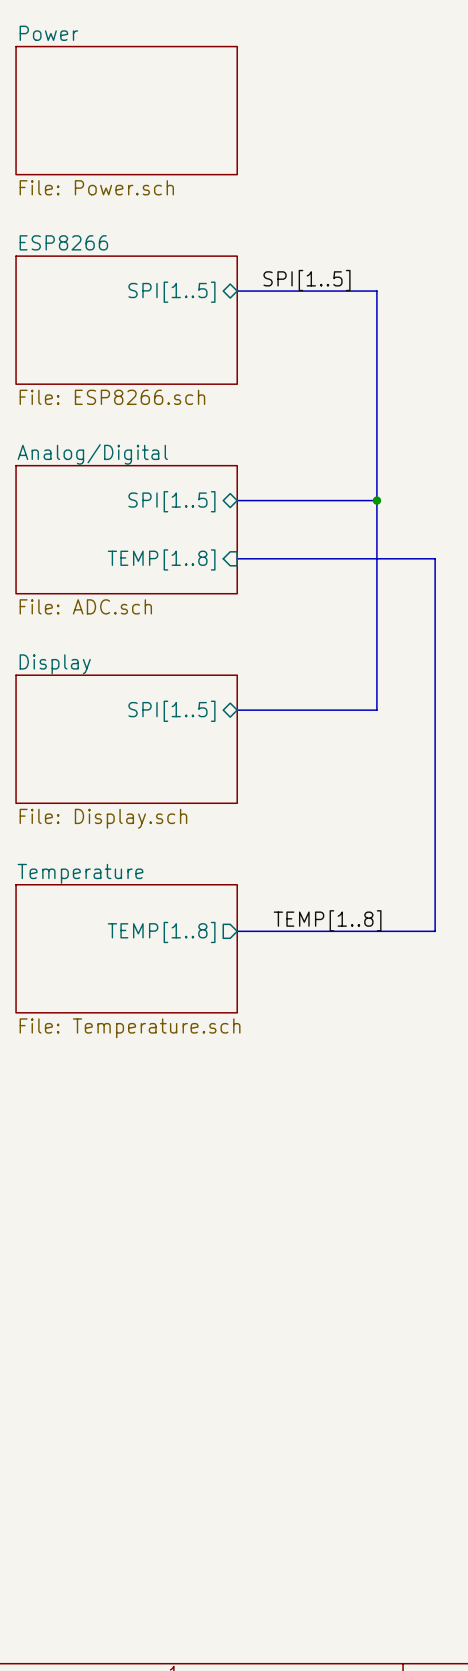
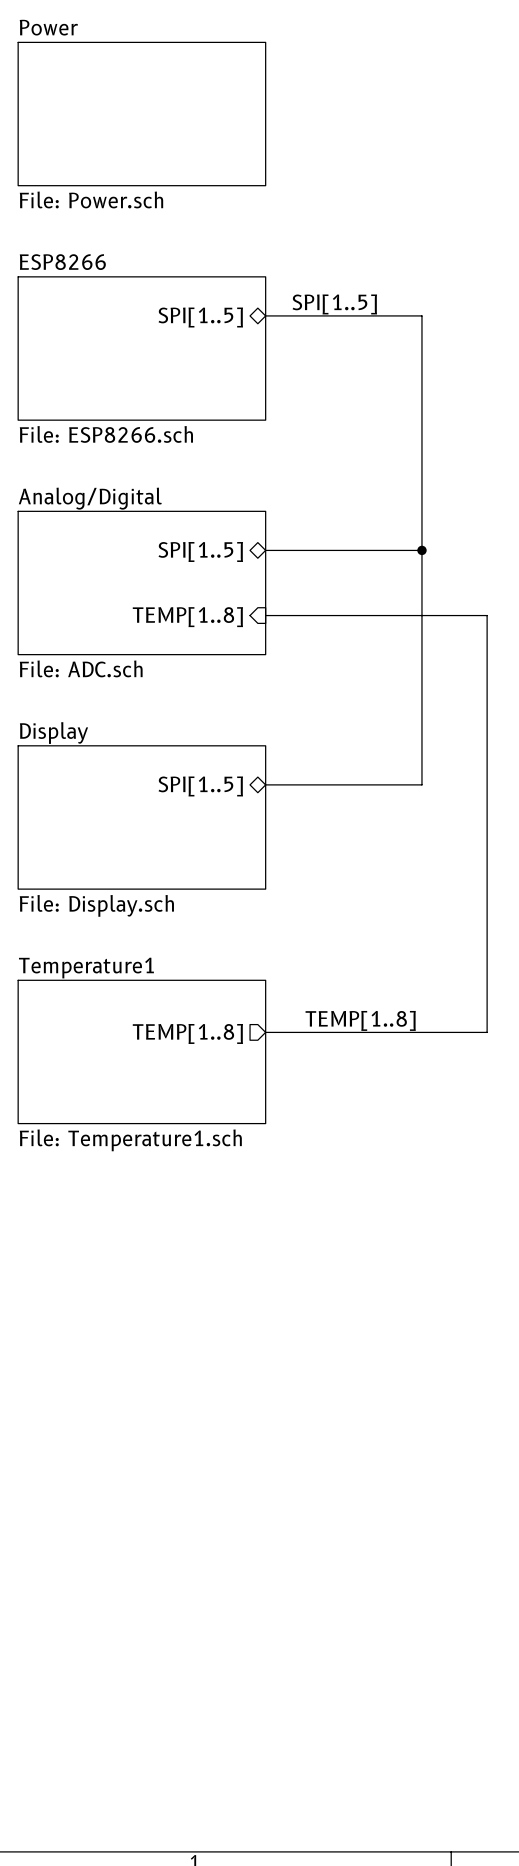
sheet Temperature name: Temperature (80, 873) -> Temperature1 (86, 968)
sheet Temperature value: File: Temperature.sch (130, 1028) -> File: Temperature1.sch (130, 1140)

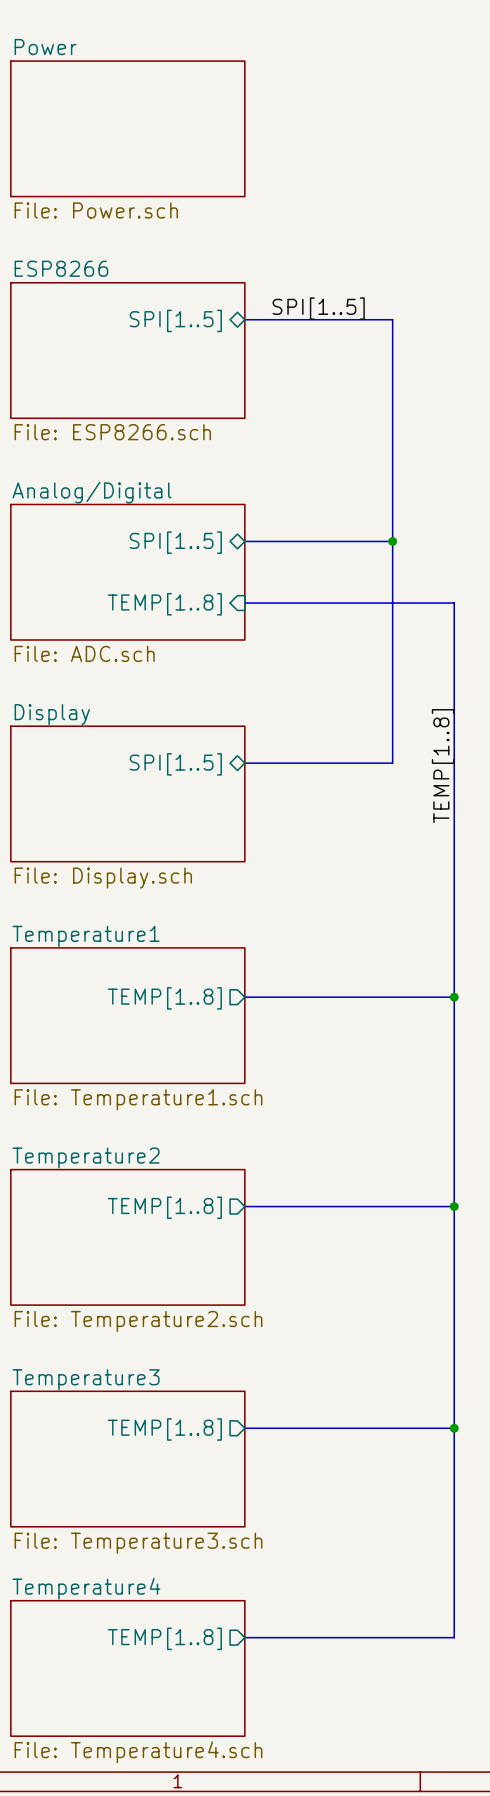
label rotation: 0° (360, 1020) -> 90° counterclockwise (443, 766)
label position: TEMP[1..8] (360, 1020) -> TEMP[1..8] (443, 766)
bus: none -> (454, 997) (454, 1637) (244, 1637)
junction: none -> (454, 997)
bus: none -> (244, 1206) (454, 1206)
junction: none -> (454, 1206)
sheet pin: none -> TEMP[1..8] (164, 1207)
sheet Temperature2: none -> File: Temperature2.sch (127, 1237)
bus: none -> (244, 1428) (454, 1428)
junction: none -> (454, 1428)
sheet pin: none -> TEMP[1..8] (164, 1429)
sheet Temperature3: none -> File: Temperature3.sch (127, 1459)
sheet pin: none -> TEMP[1..8] (164, 1638)
sheet Temperature4: none -> File: Temperature4.sch (127, 1668)

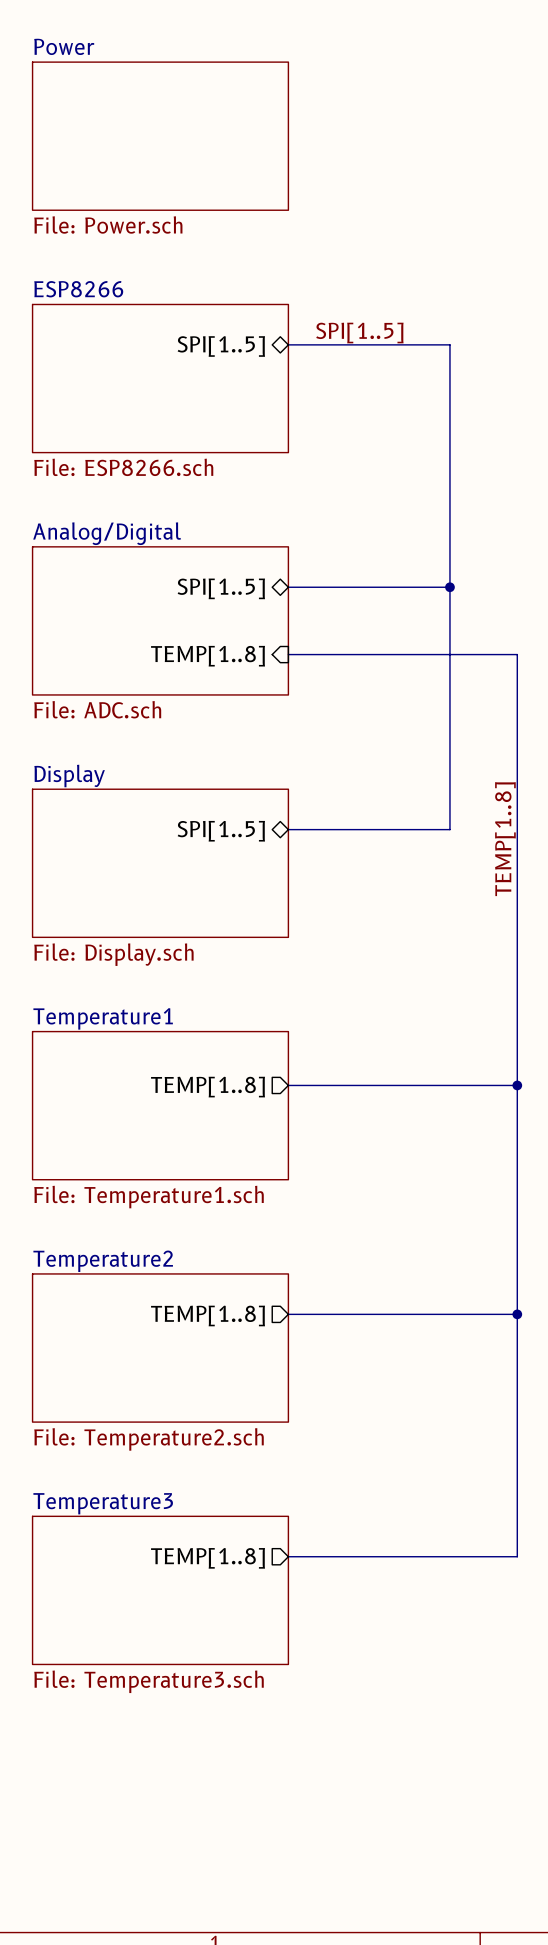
bus: (454, 1428) (454, 1637) (244, 1637) -> none
junction: (454, 1428) -> none
sheet pin: TEMP[1..8] (164, 1638) -> none
sheet Temperature4: File: Temperature4.sch (127, 1668) -> none

